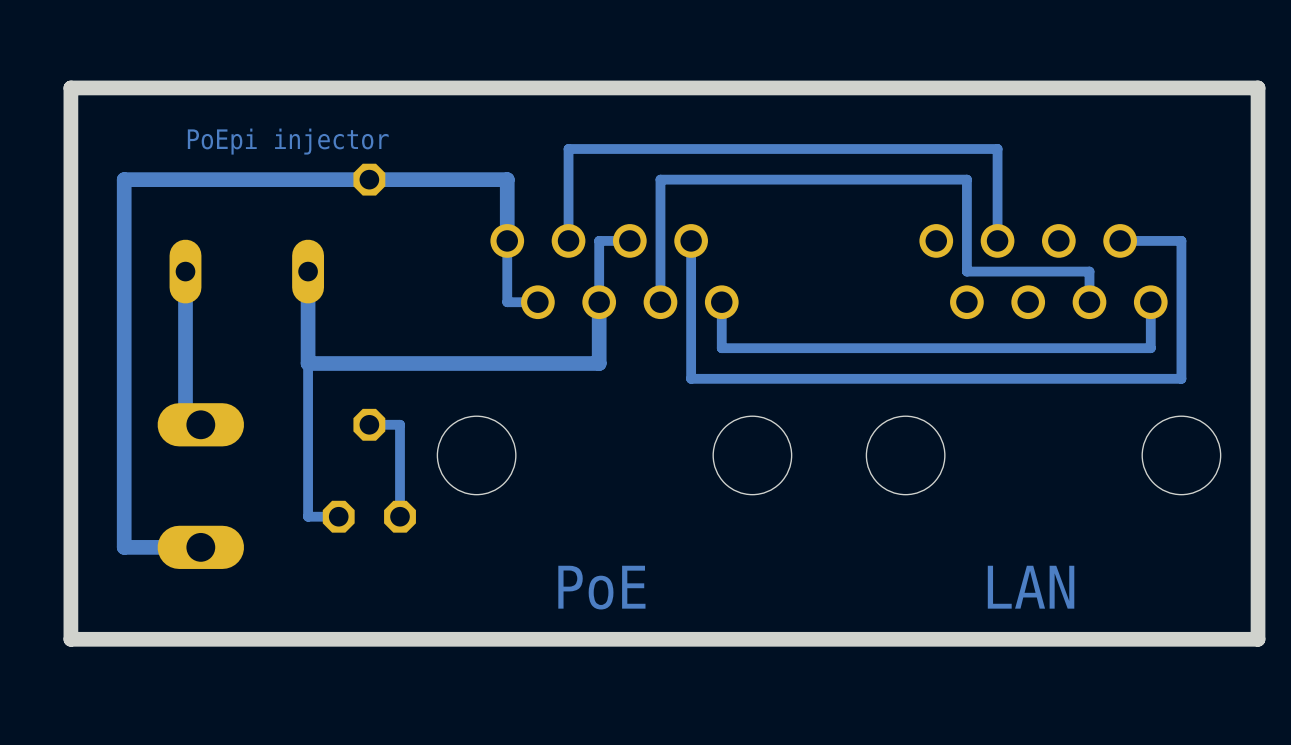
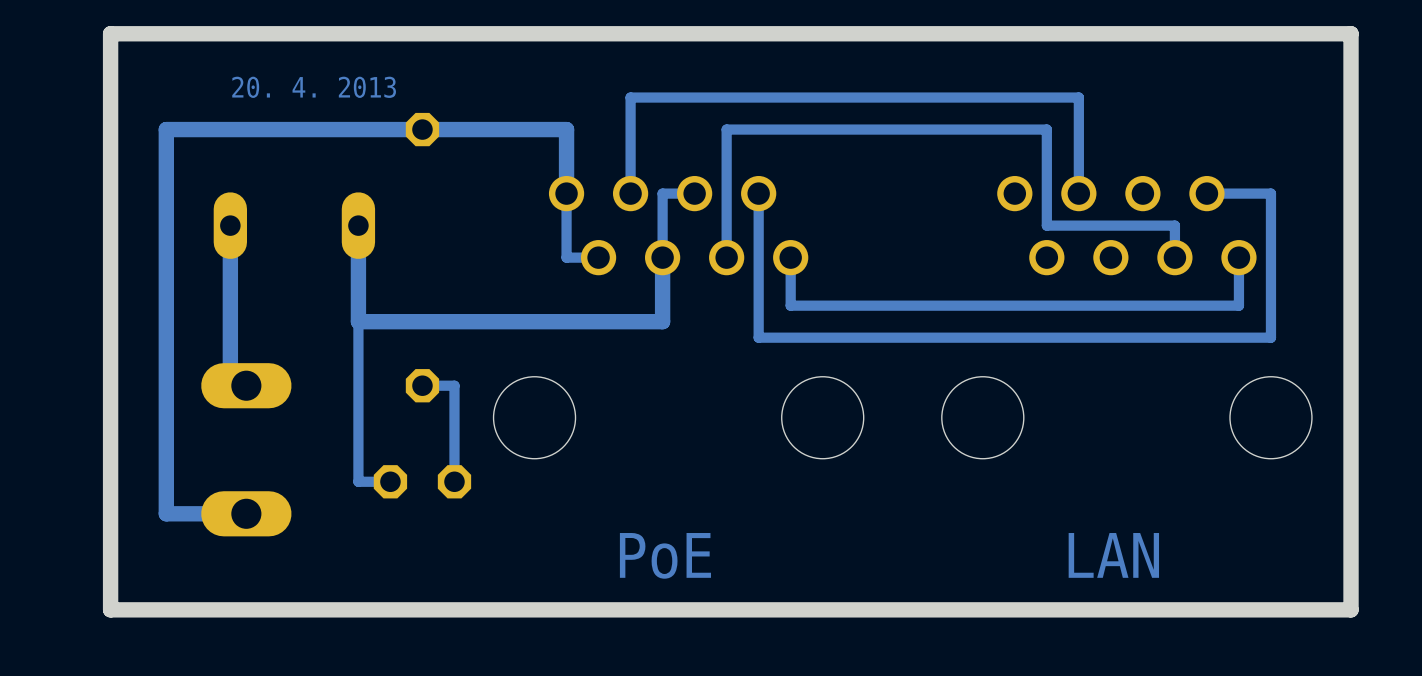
text: PoEpi injector (288, 141) -> 20. 4. 2013 (314, 87)

